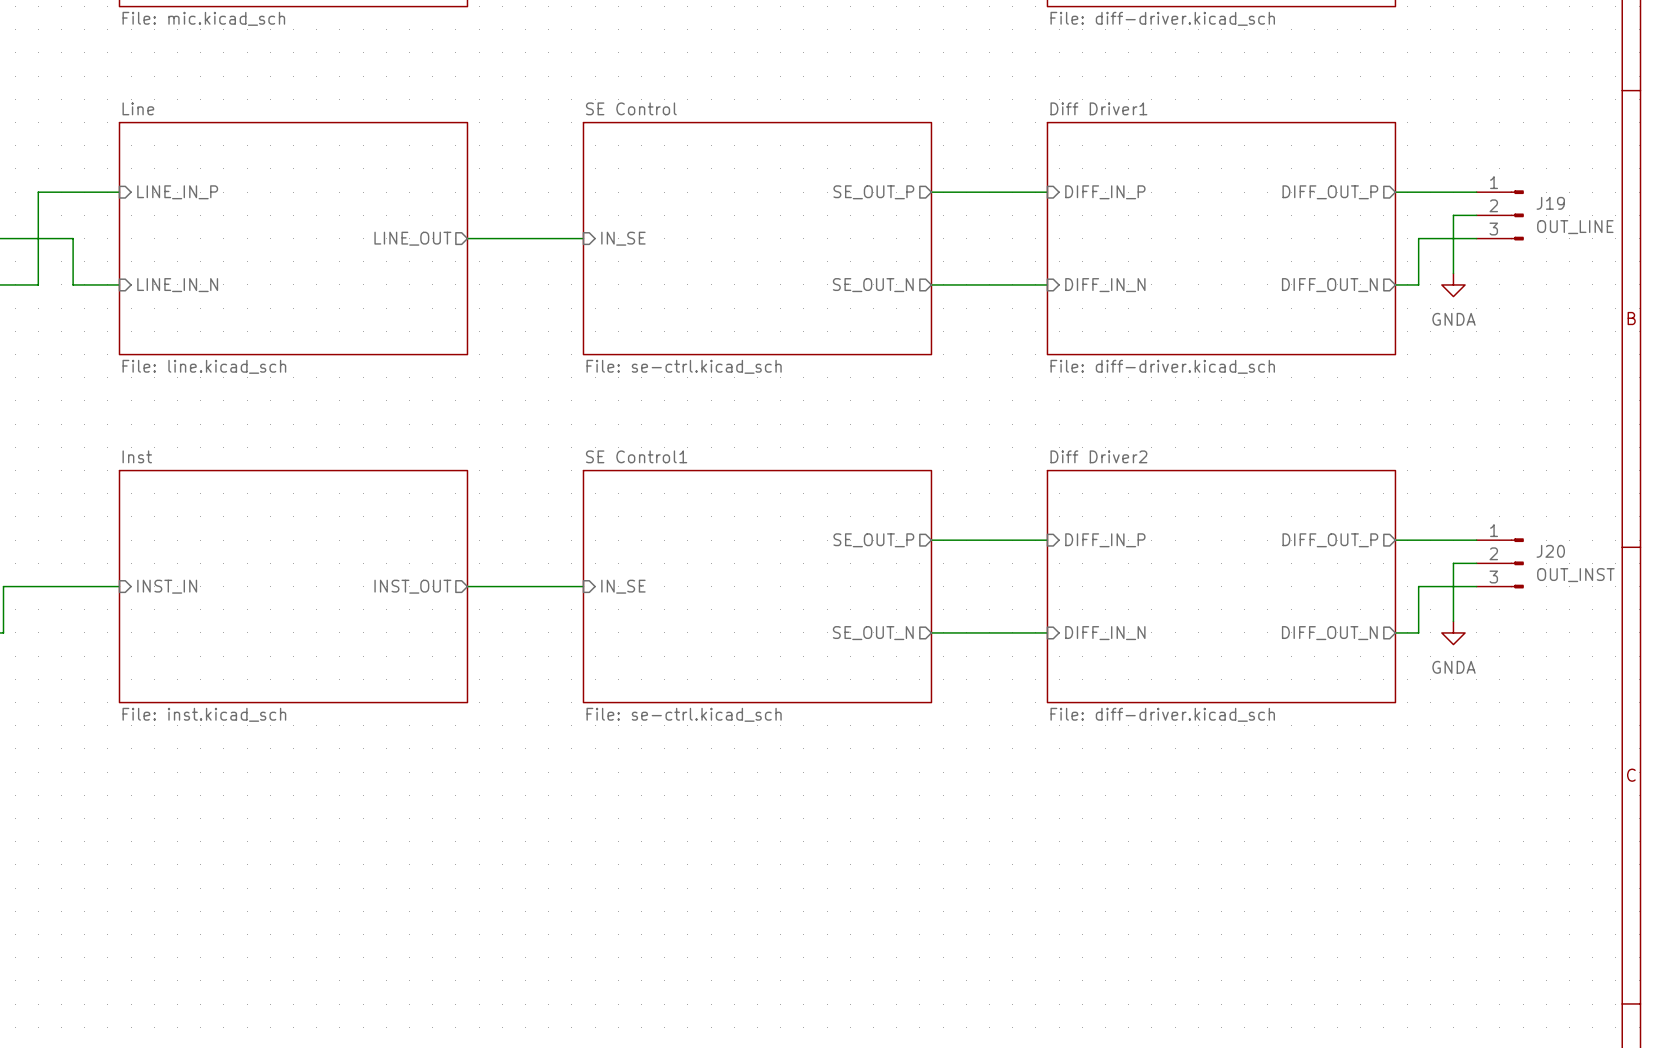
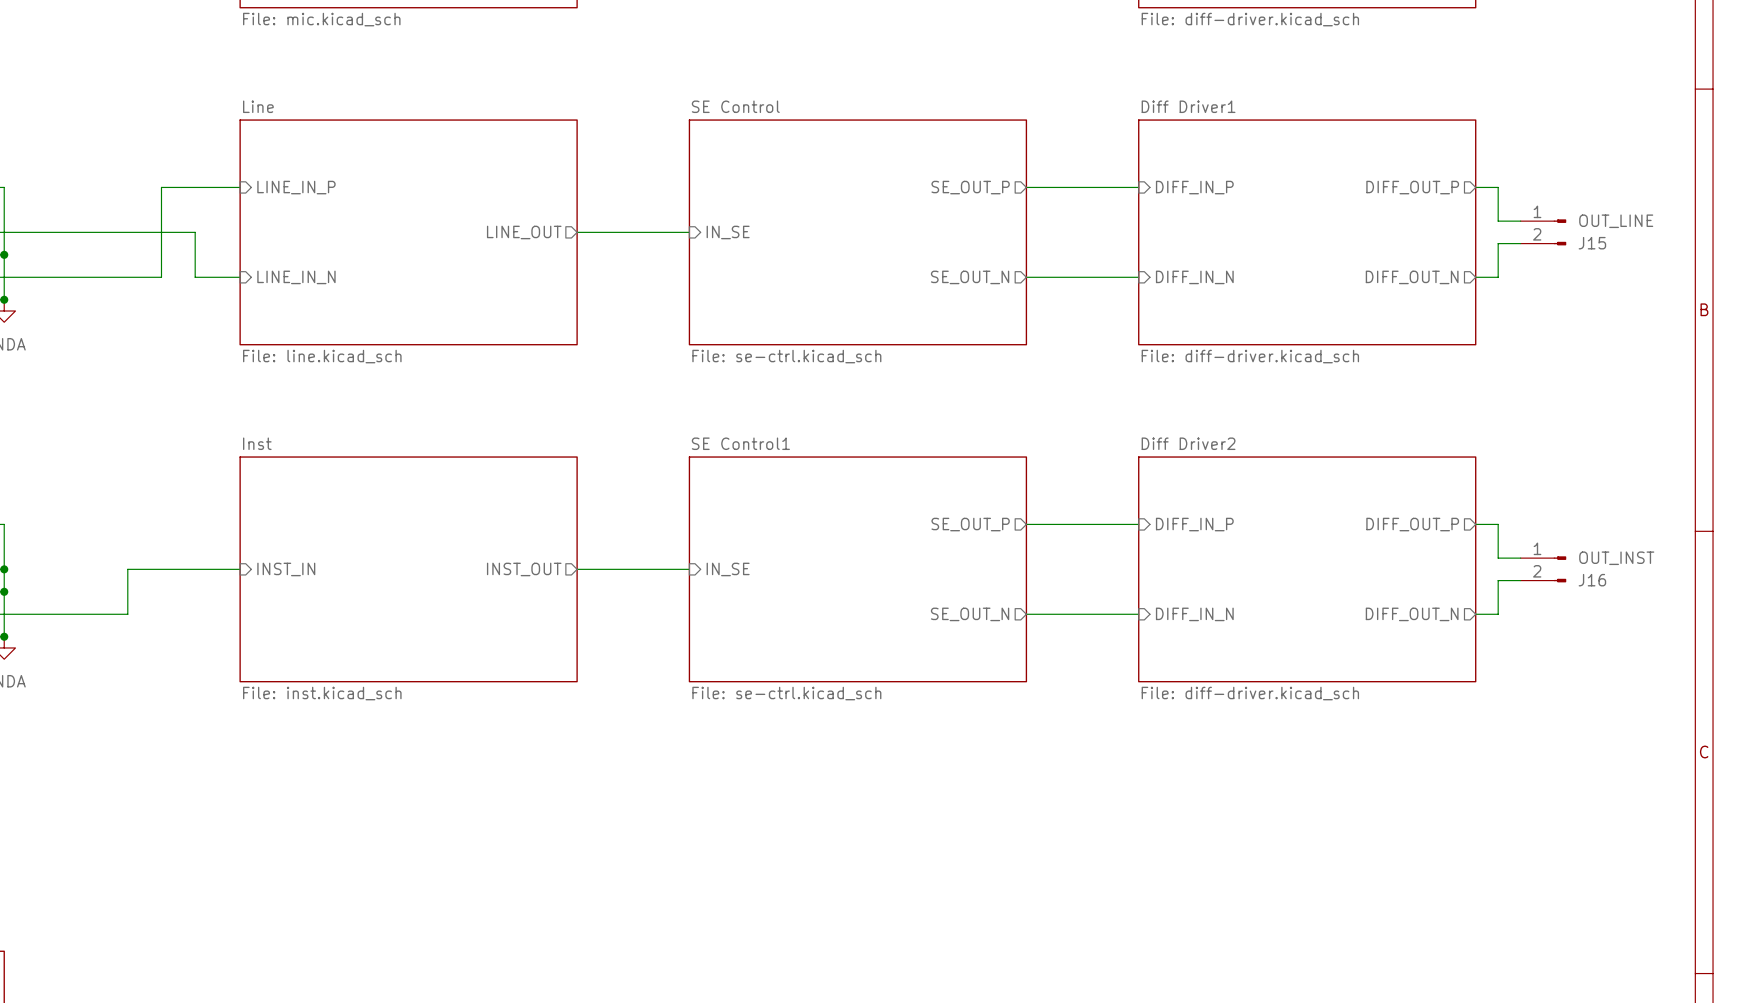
wire: (1418, 192) (1476, 192) -> (1498, 187) (1498, 221) (1520, 221)
wire: (1476, 215) (1453, 215) (1453, 273) -> none
J19: OUT_LINE (1500, 215) -> none
J15: none -> OUT_LINE (1543, 232)
wire: (1476, 238) (1418, 238) (1418, 250) -> (1520, 243) (1498, 243)
power symbol: GNDA (1453, 284) -> none
wire: (1418, 540) (1476, 540) -> (1498, 524) (1498, 558) (1520, 558)
wire: (1476, 563) (1453, 563) (1453, 621) -> none
J20: OUT_INST (1500, 563) -> none
J16: none -> OUT_INST (1543, 569)
wire: (1476, 586) (1418, 586) (1418, 598) -> (1520, 580) (1498, 580)
power symbol: GNDA (1453, 632) -> none

